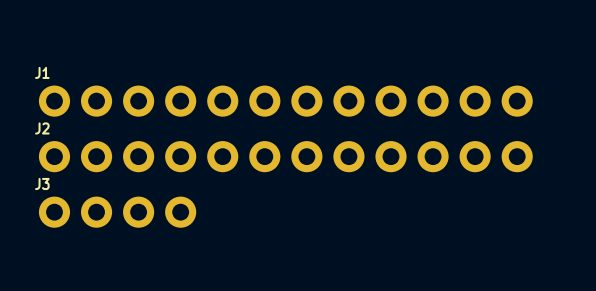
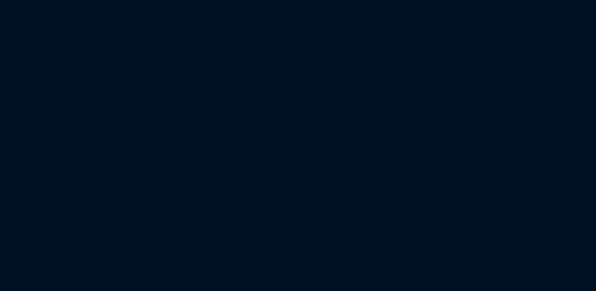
J1: (285, 101) -> none
J2: (285, 156) -> none
J3: (117, 212) -> none

